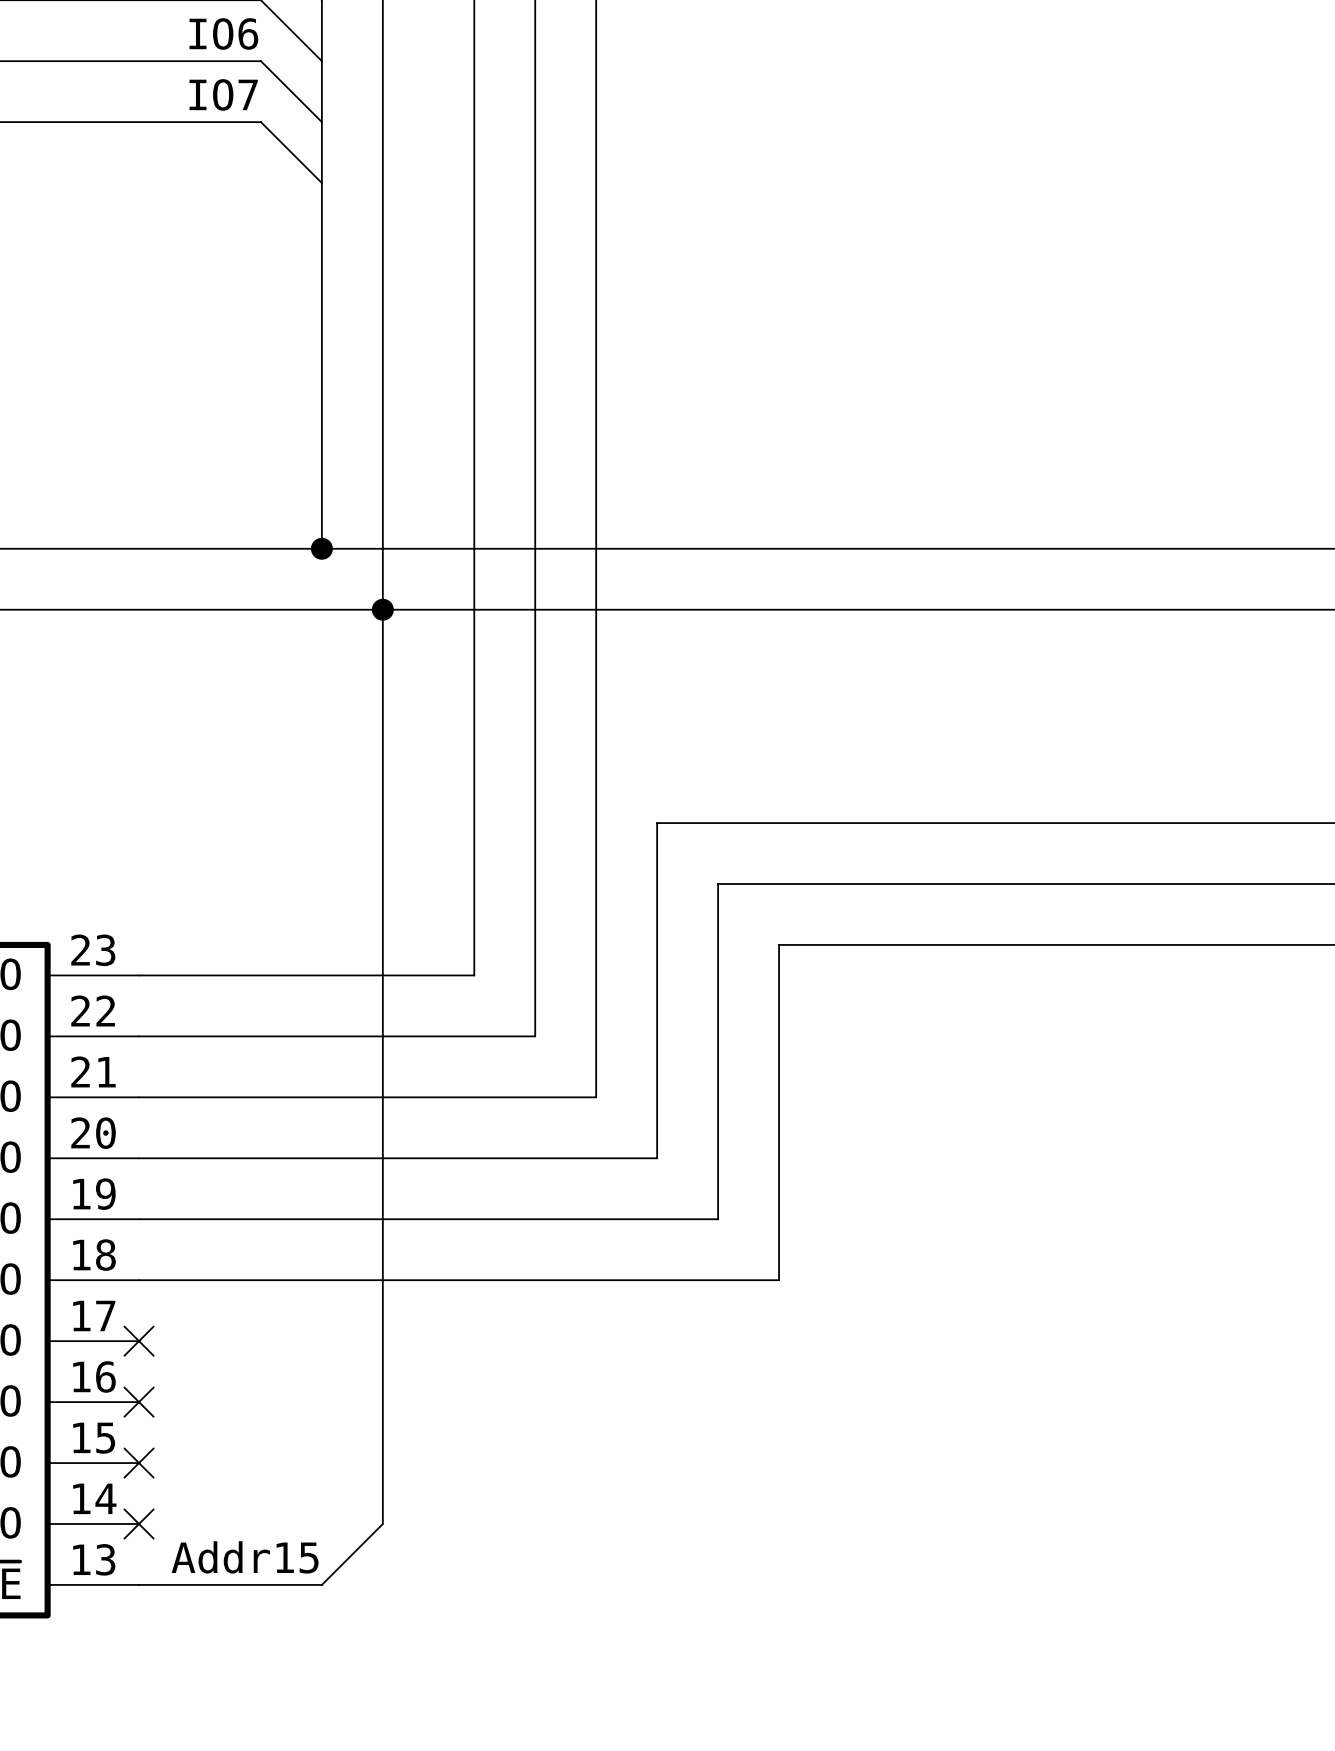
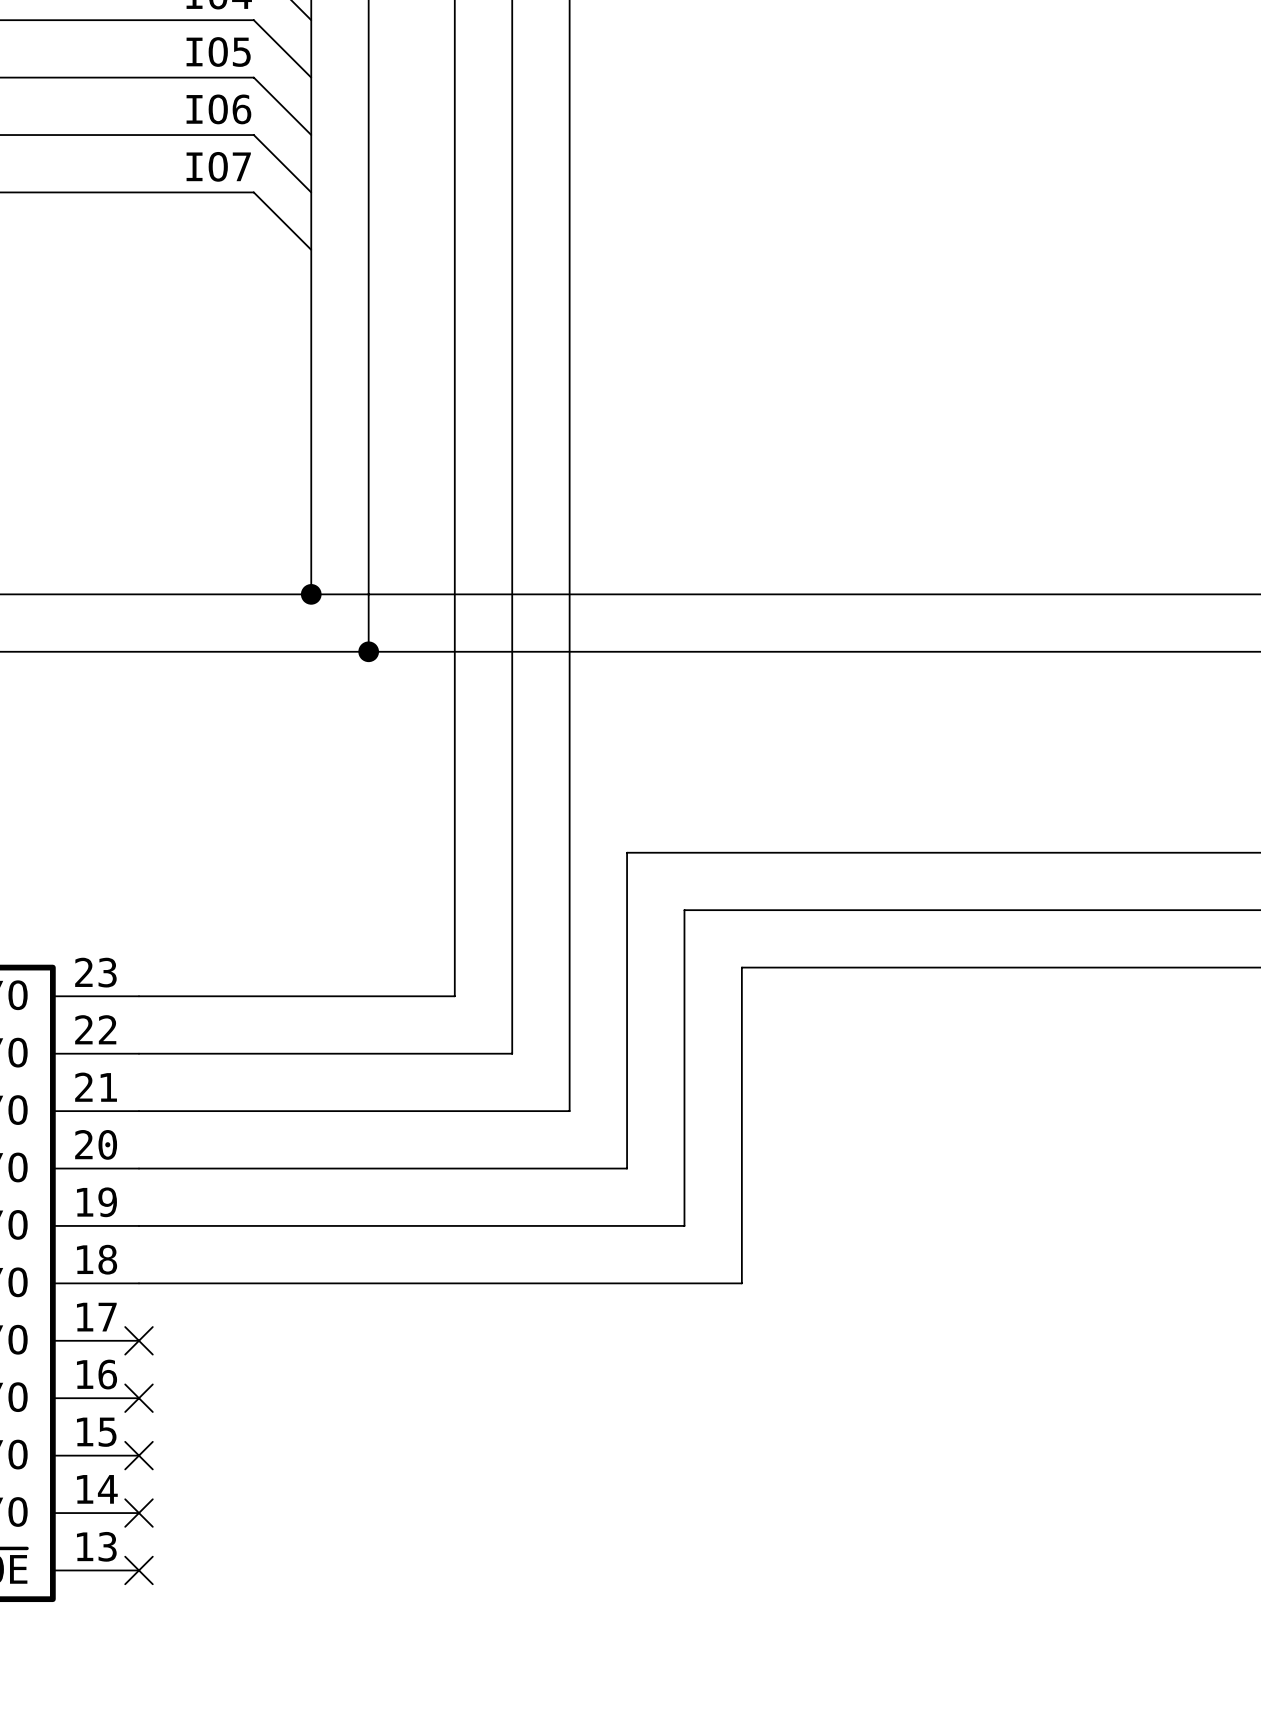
bus: (382, 609) (382, 1524) -> none
wire: (382, 1524) (321, 1584) (139, 1584) -> none
label: Addr15 (245, 1557) -> none
no-connect mark: none -> (139, 1570)

